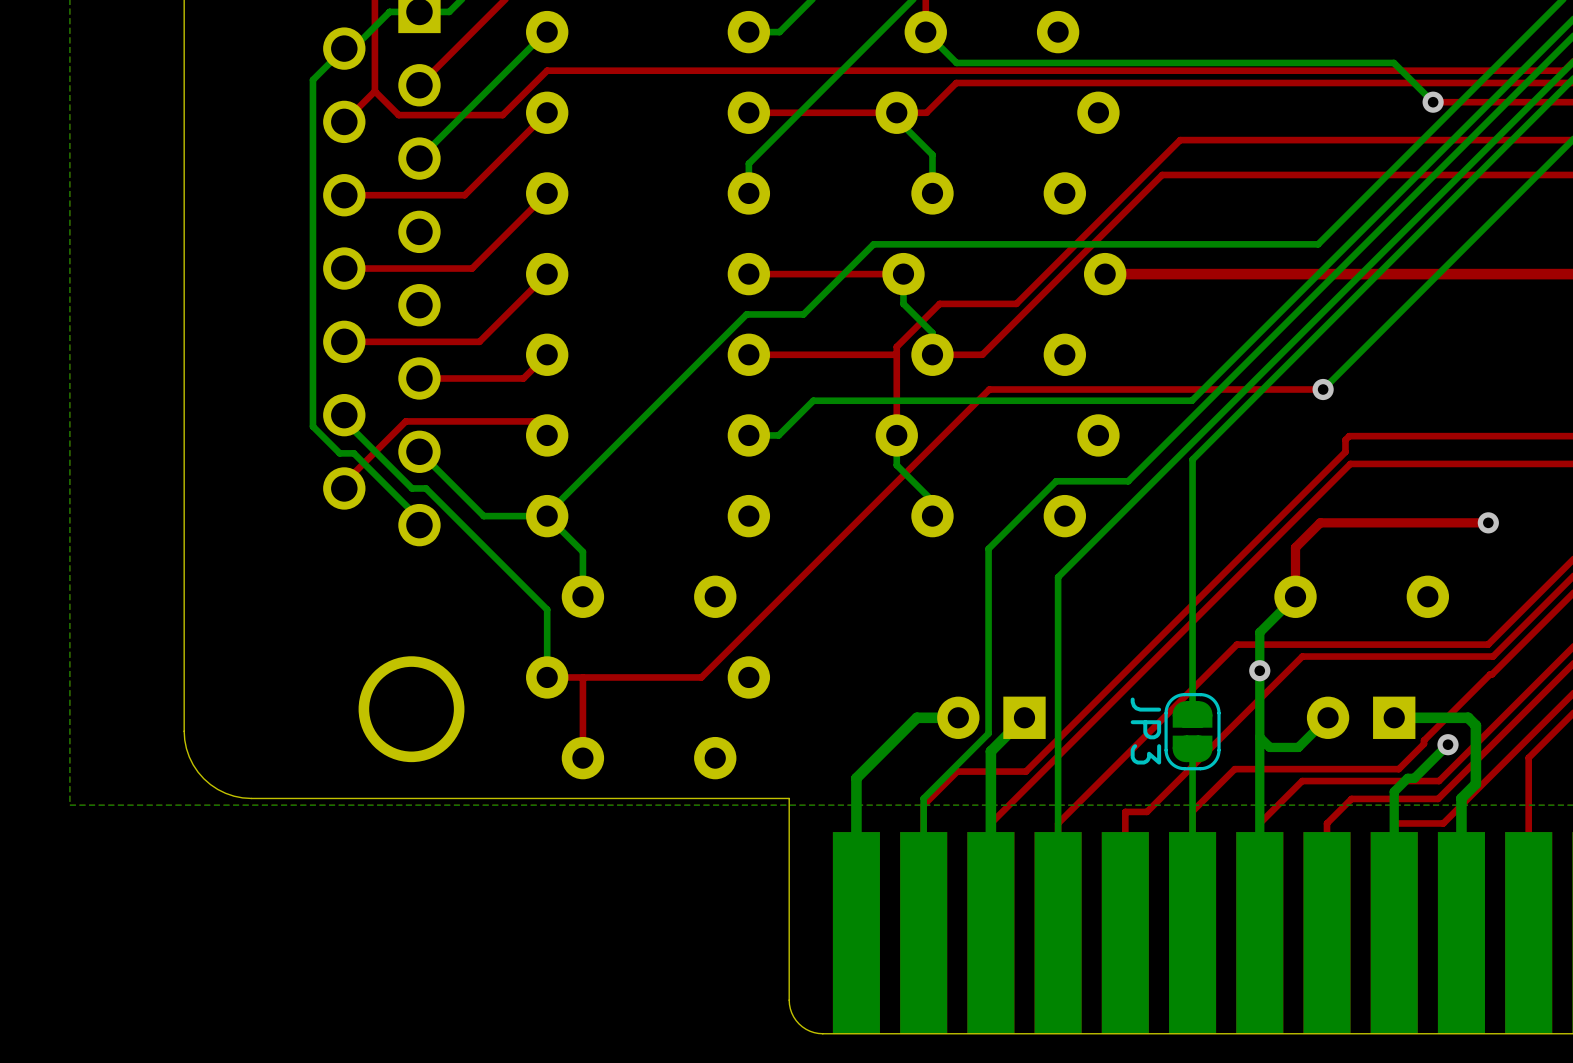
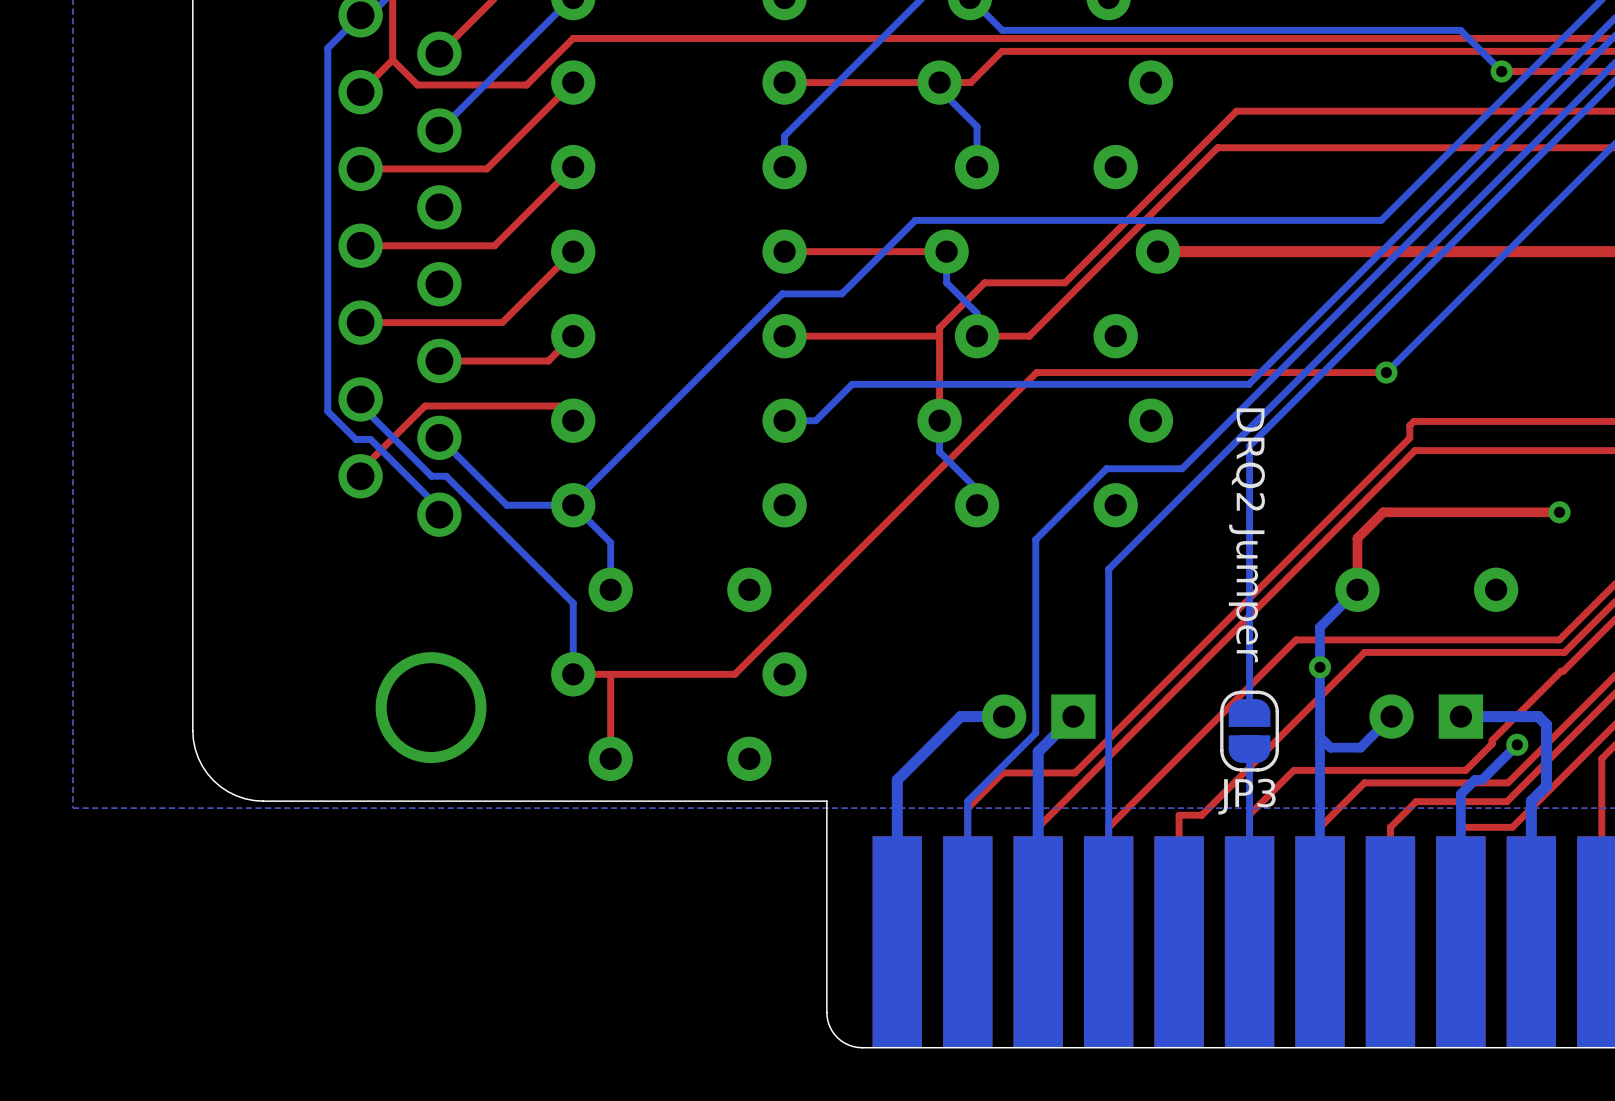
JP3 value: none -> DRQ2 Jumper (1246, 535)
JP3 name rotation: 0° (1145, 731) -> 90° counterclockwise (1247, 796)

